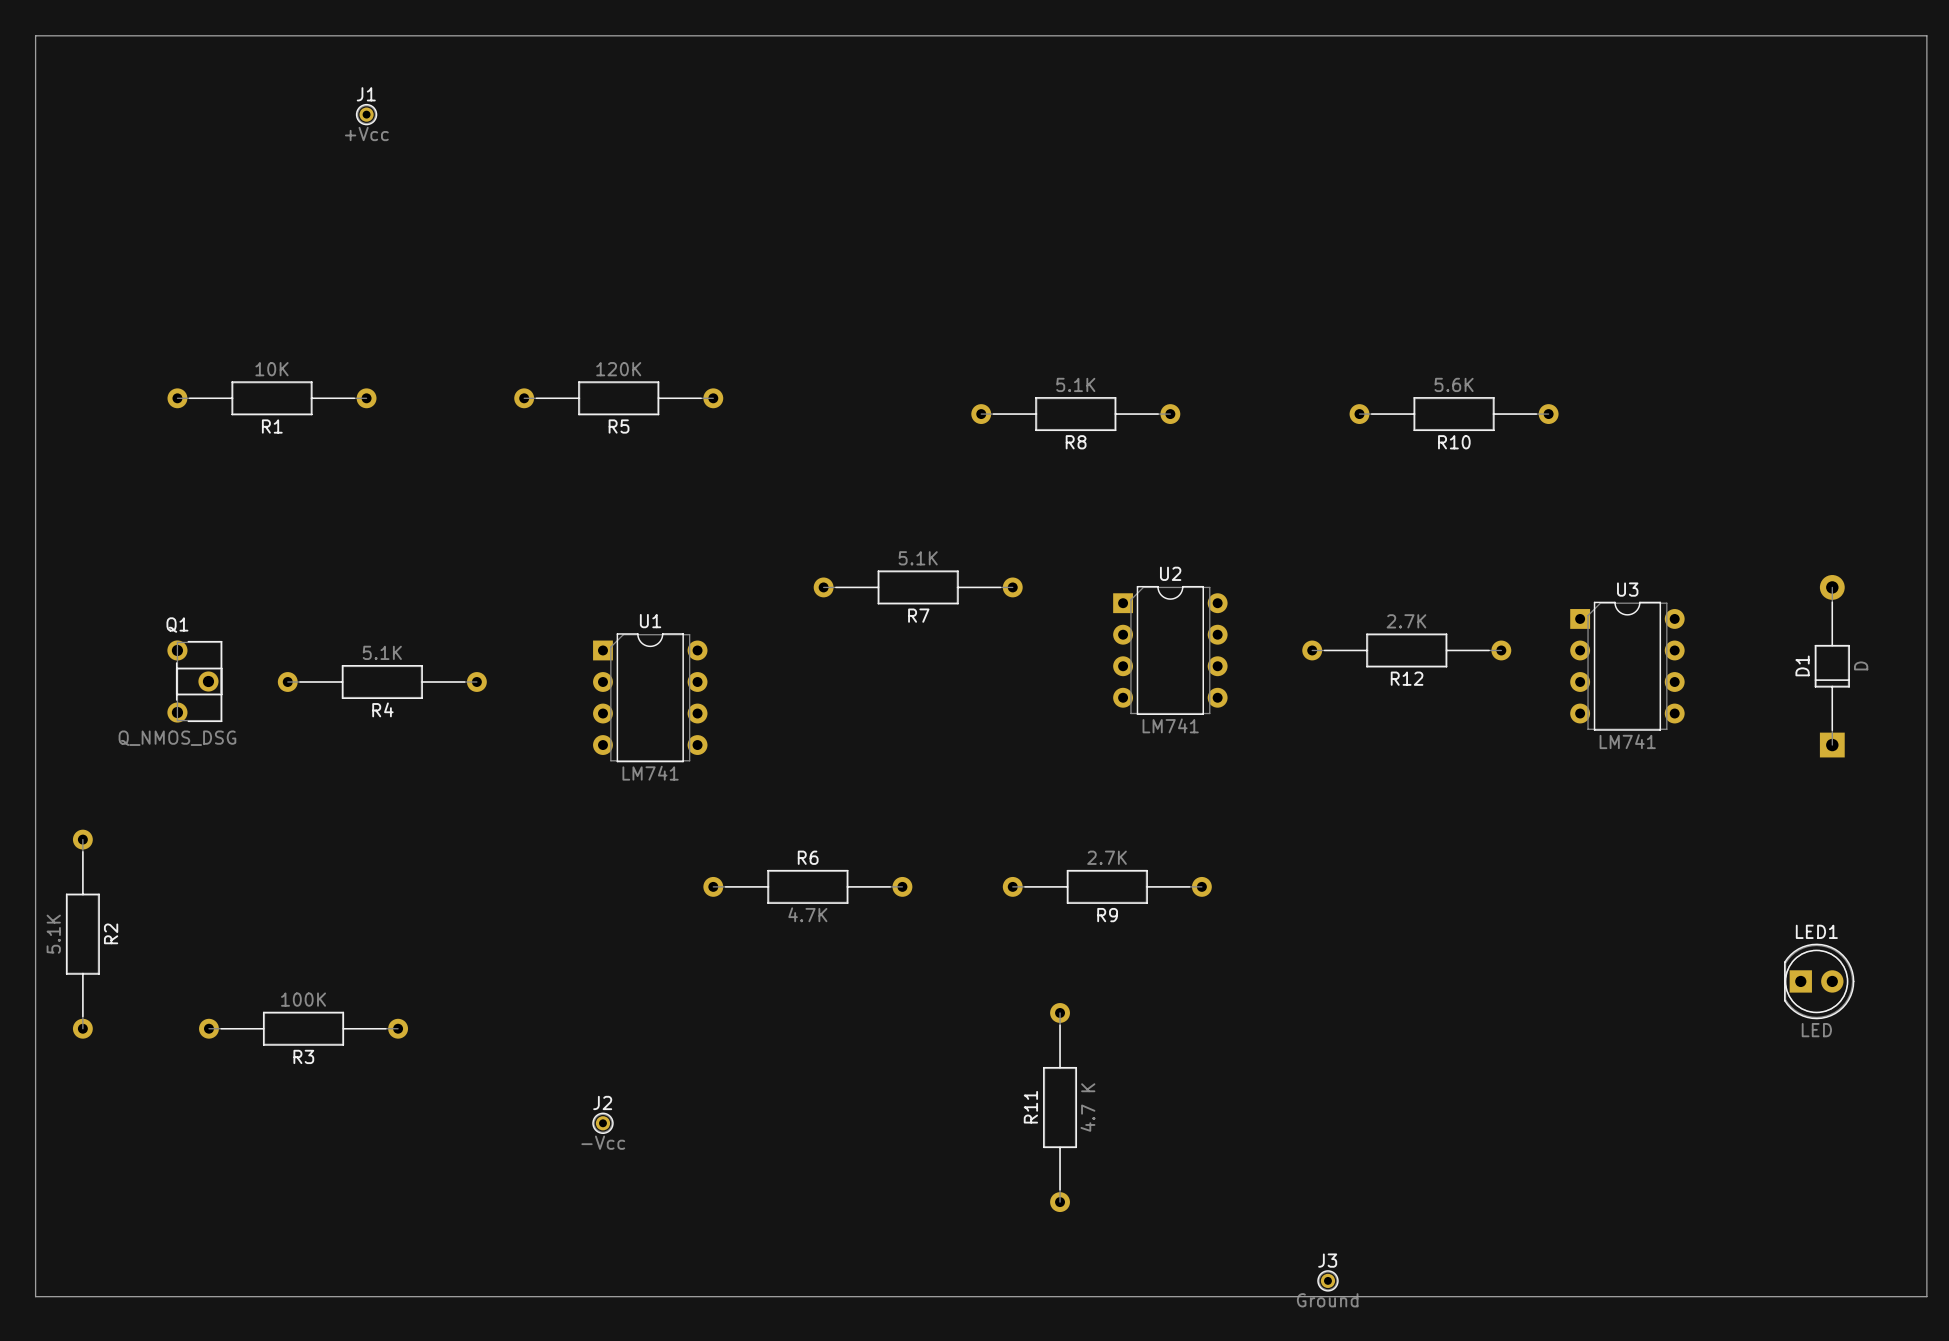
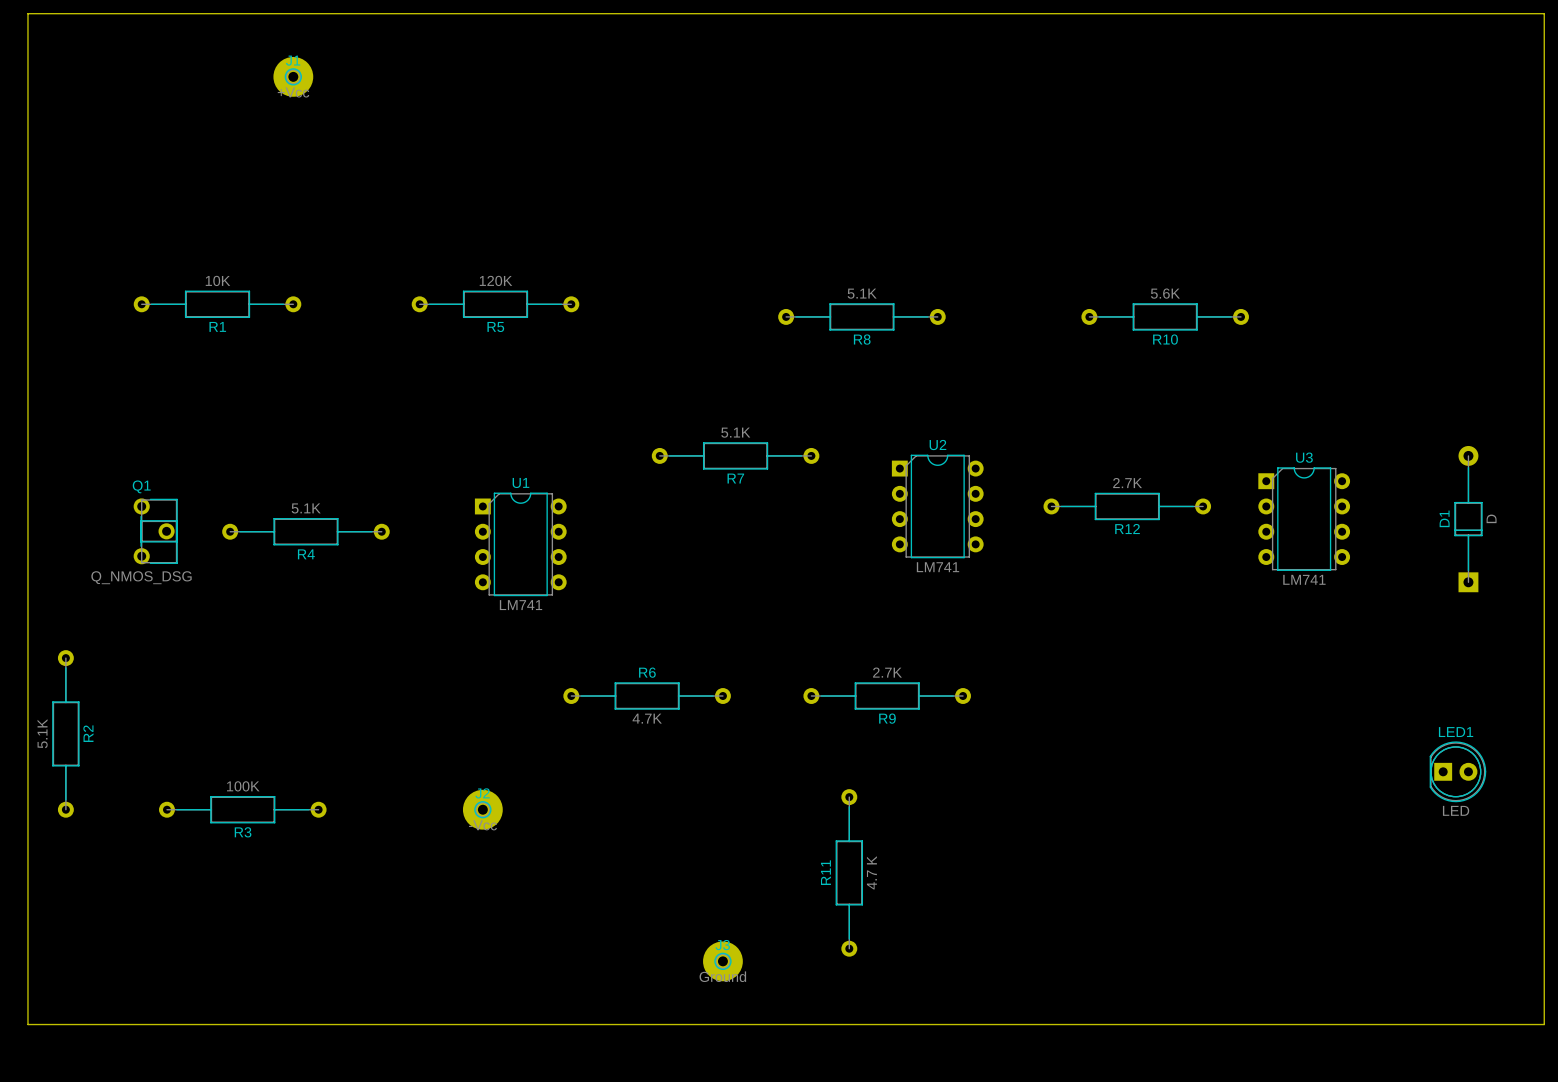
J1 footprint: [355, 103, 378, 126] -> [273, 56, 314, 97]
J2 footprint: [592, 1112, 614, 1135] -> [462, 789, 503, 830]
J3 footprint: [1317, 1270, 1339, 1292] -> [703, 941, 743, 982]

